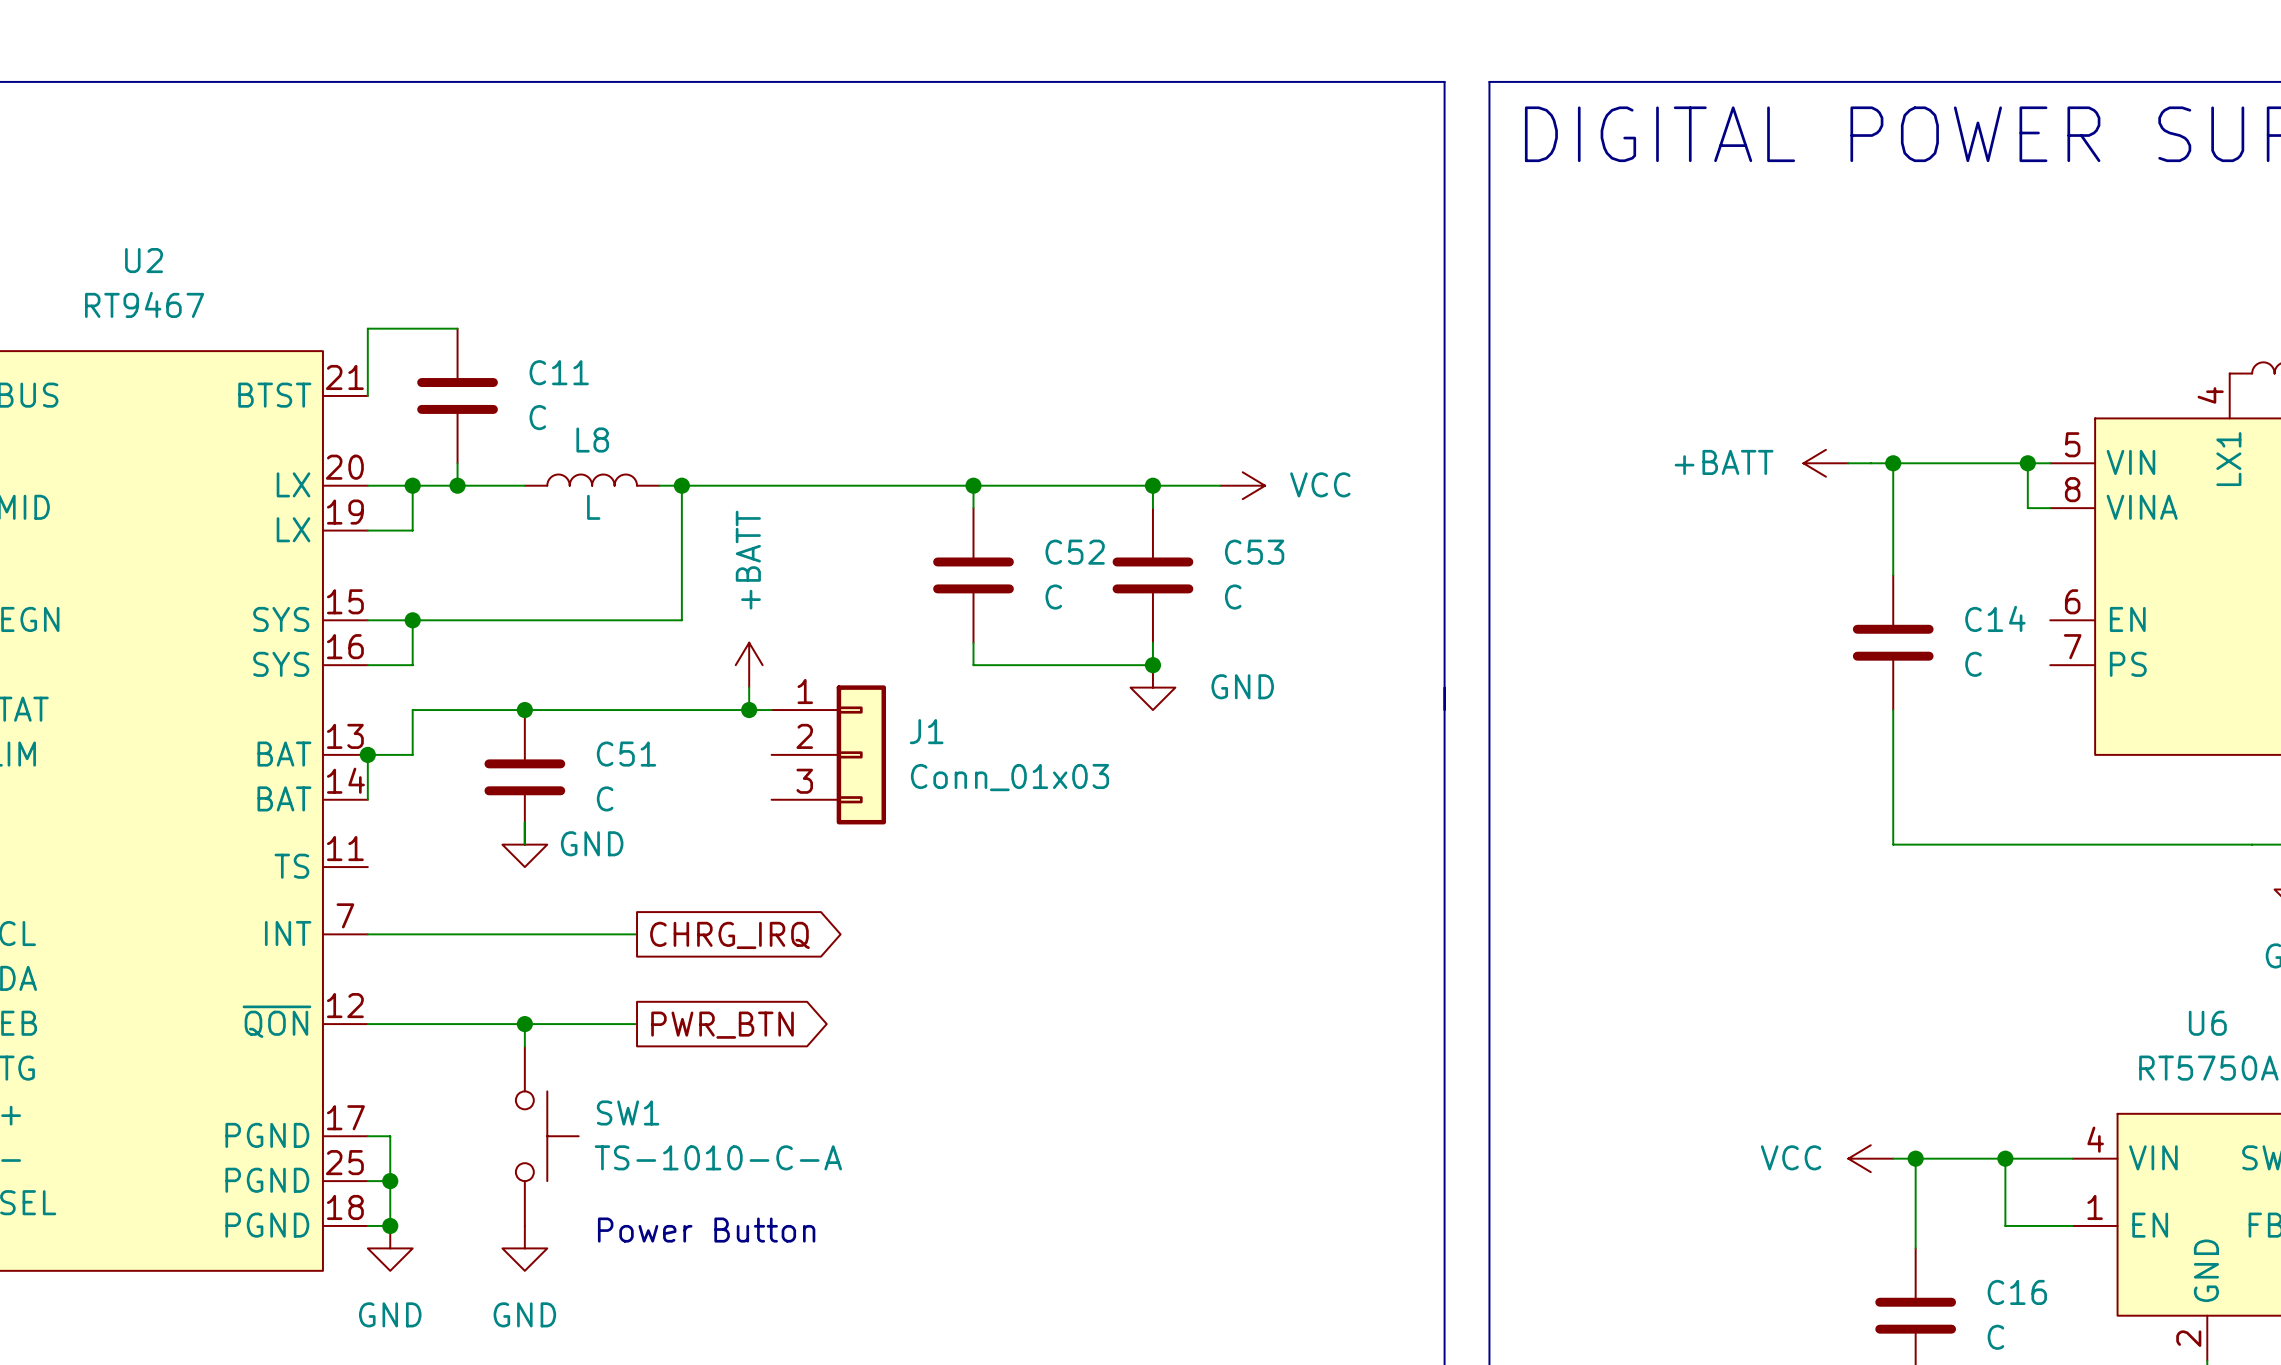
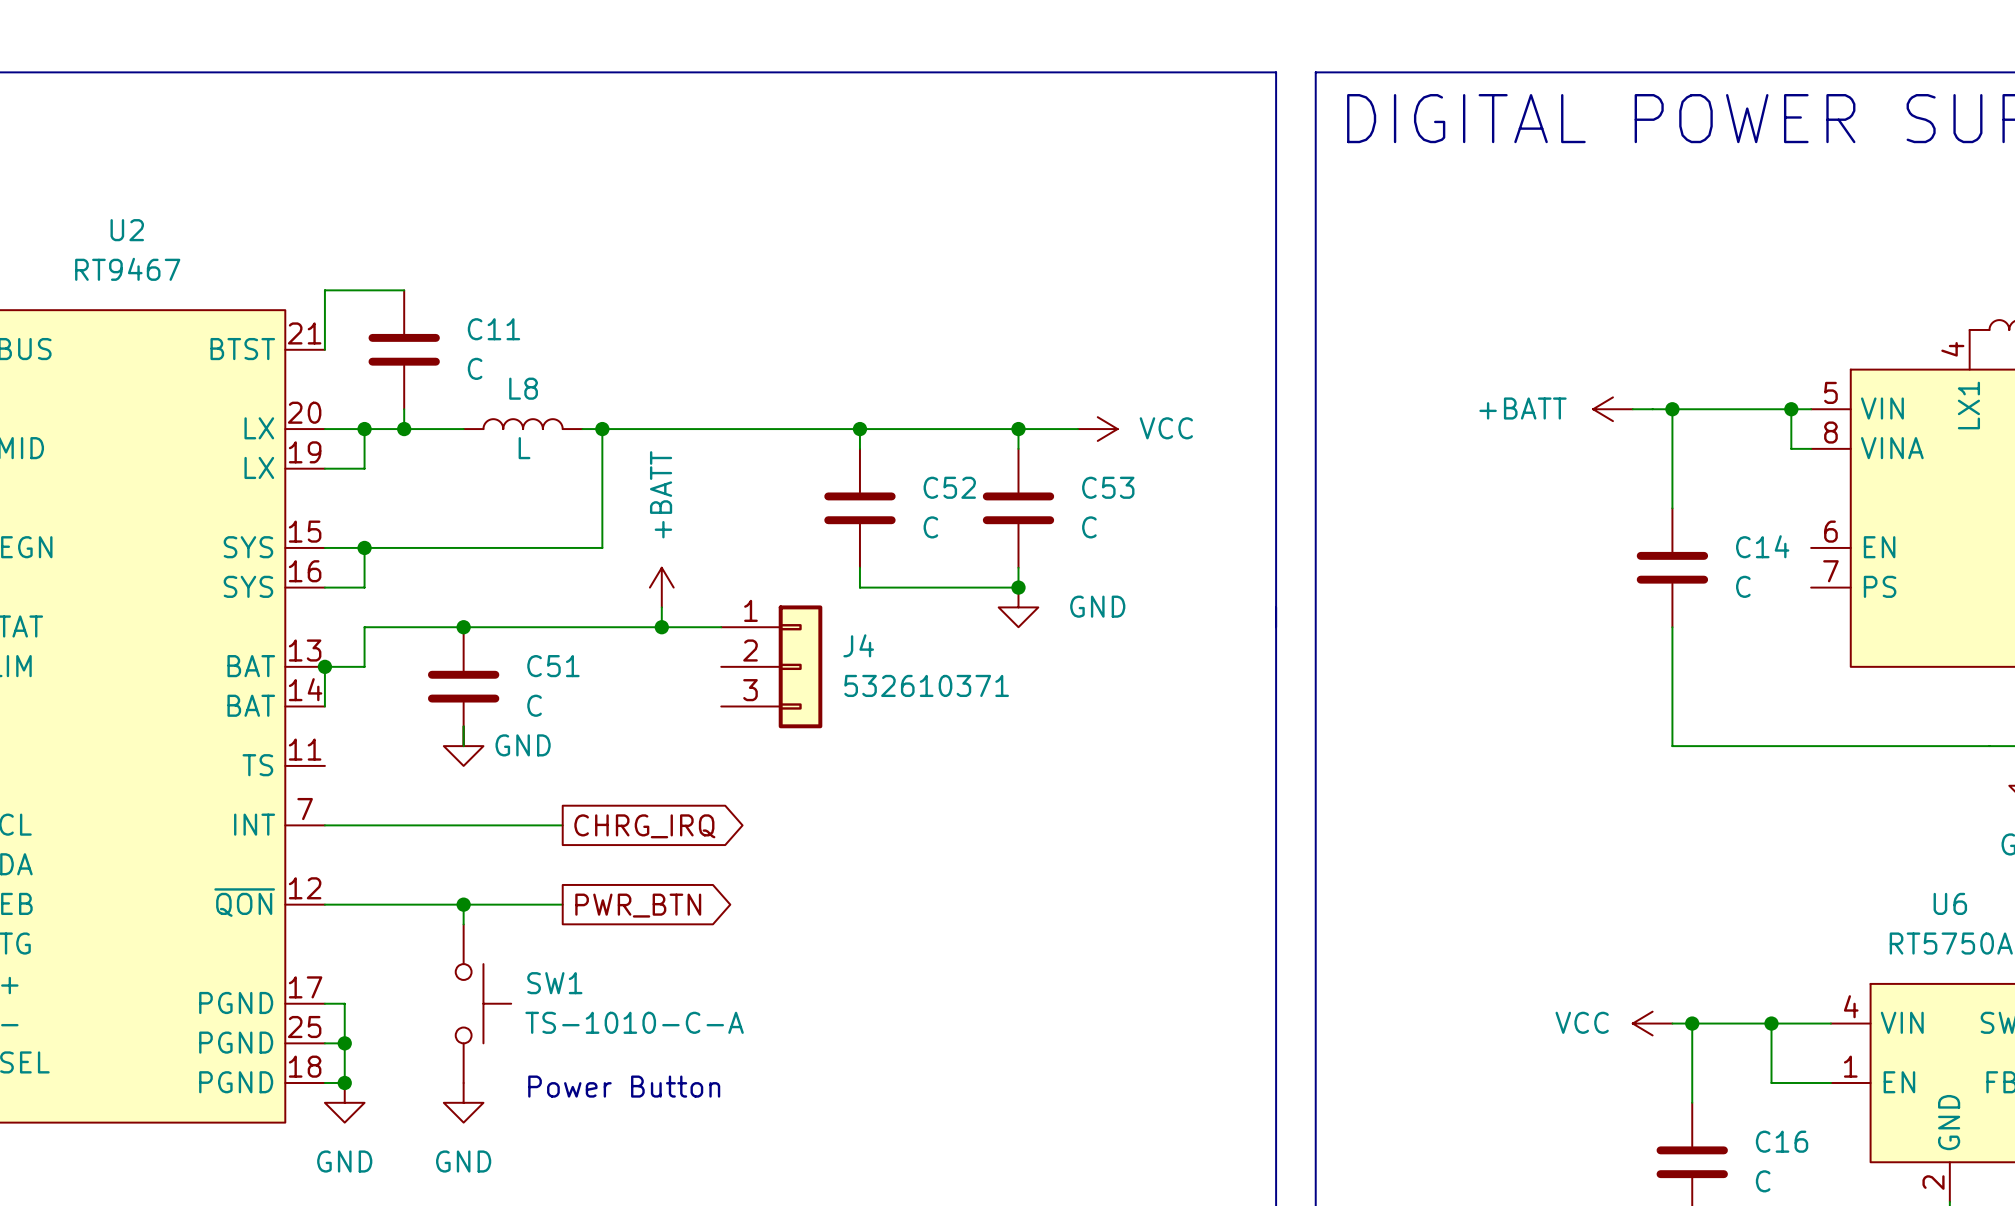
J1: Conn_01x03 (828, 754) -> none
J4: none -> 532610371 (771, 666)

